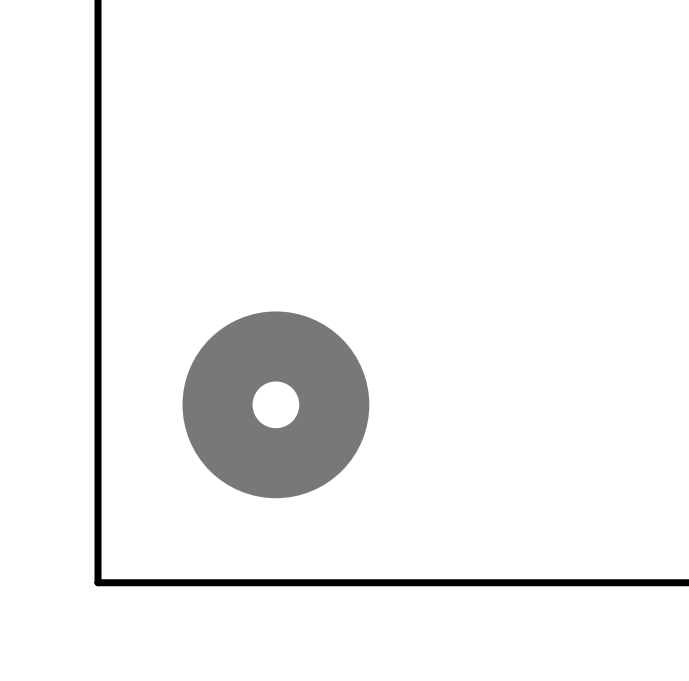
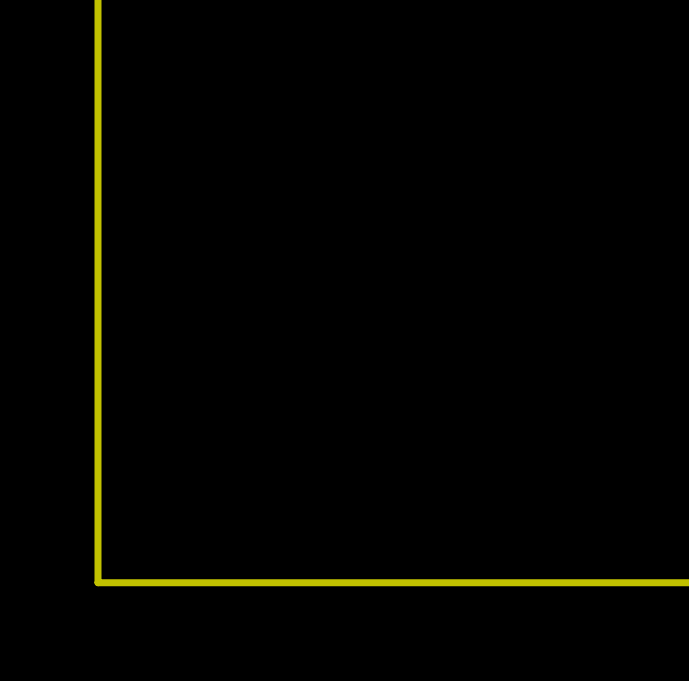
via: (275, 404) -> none

